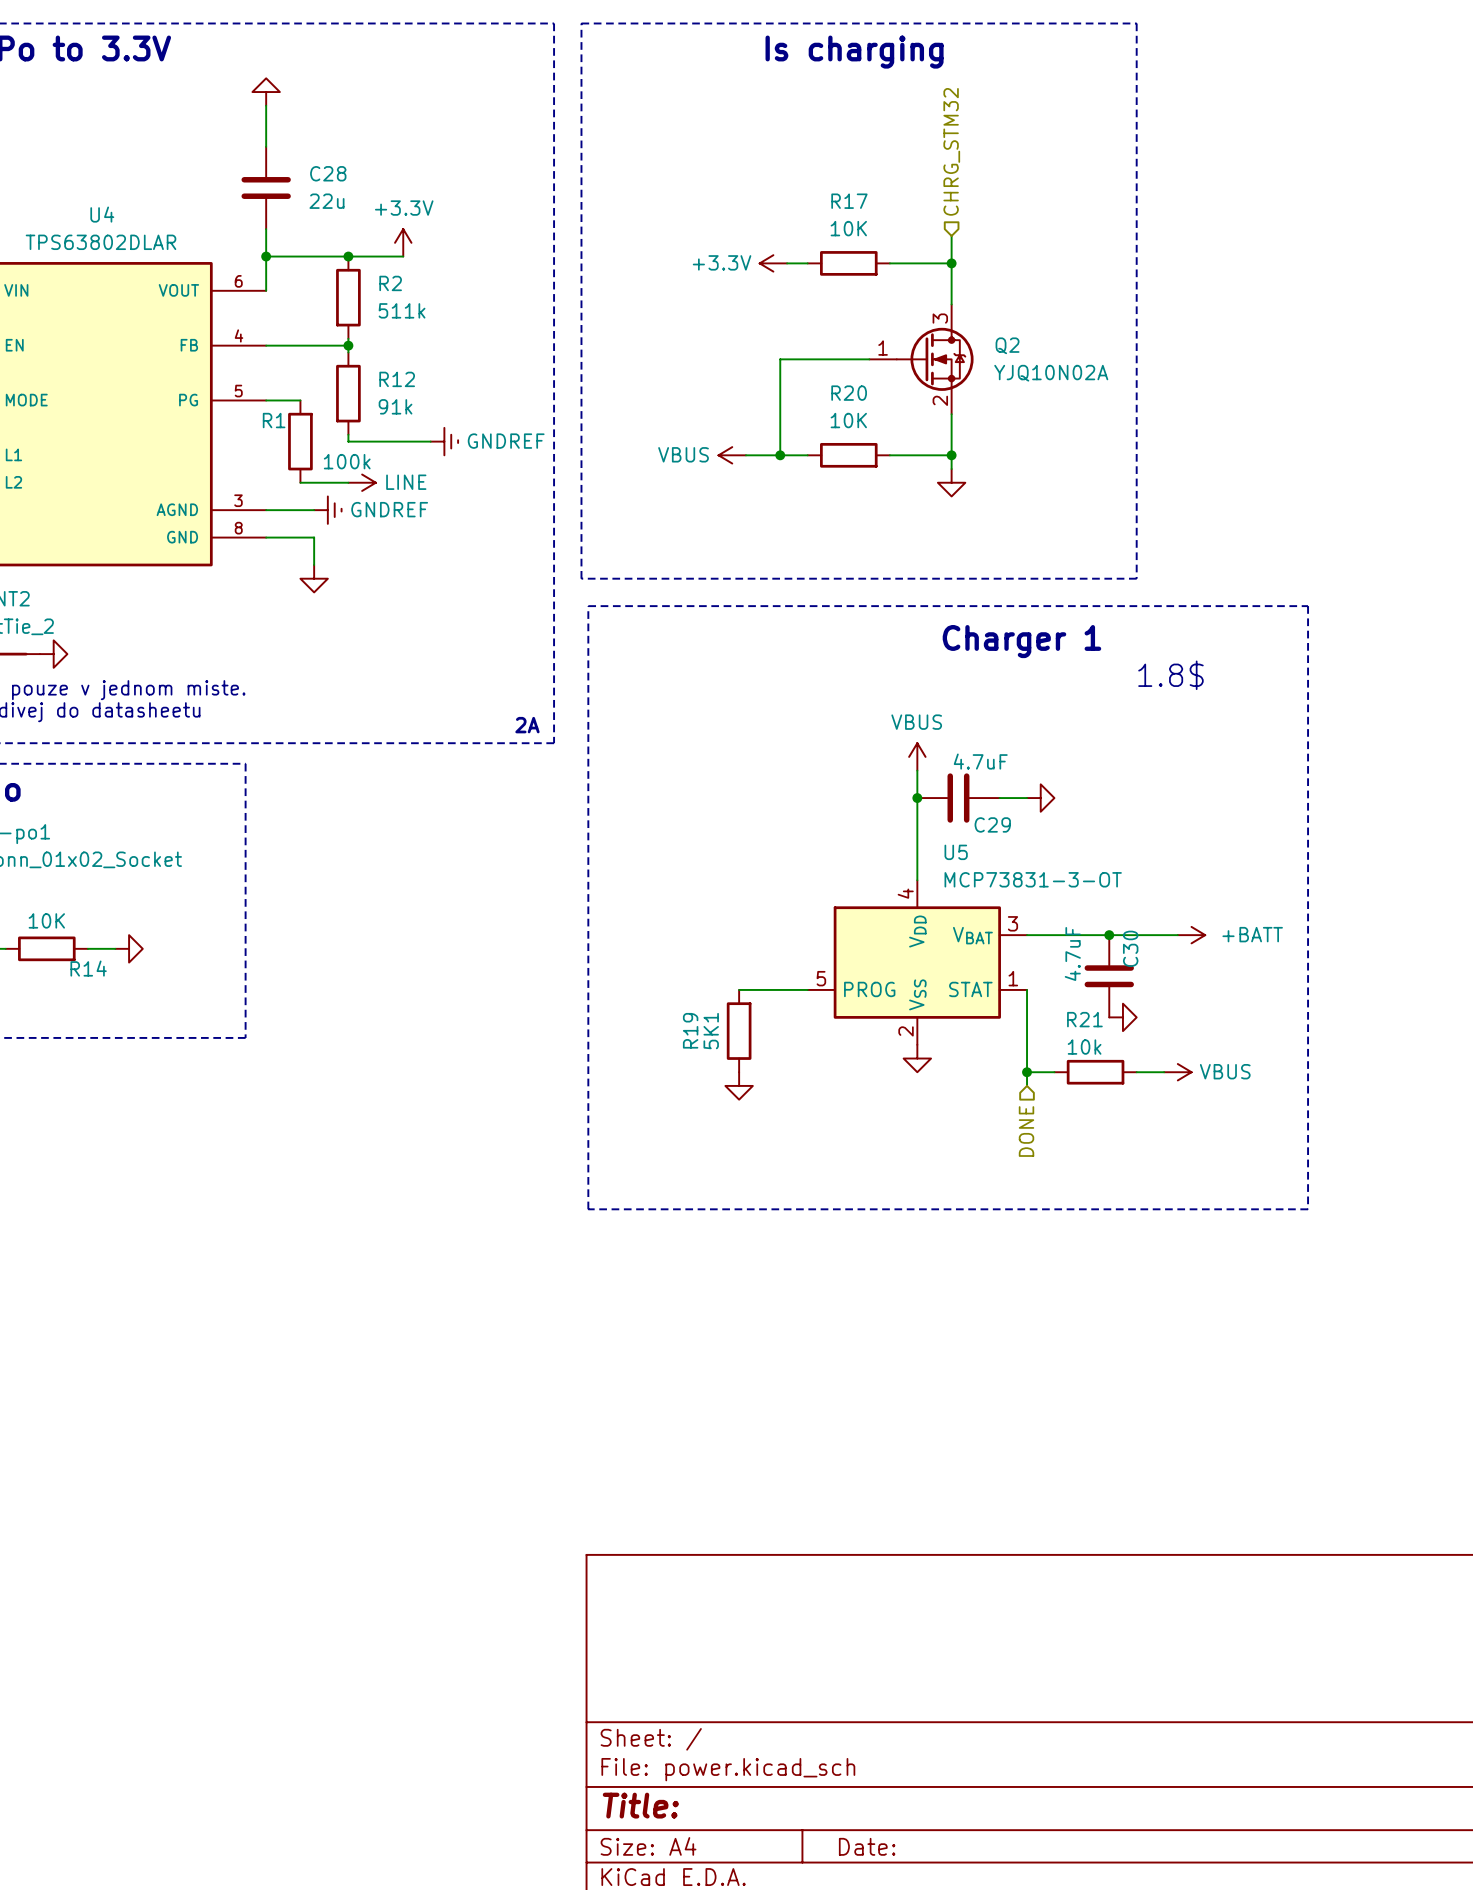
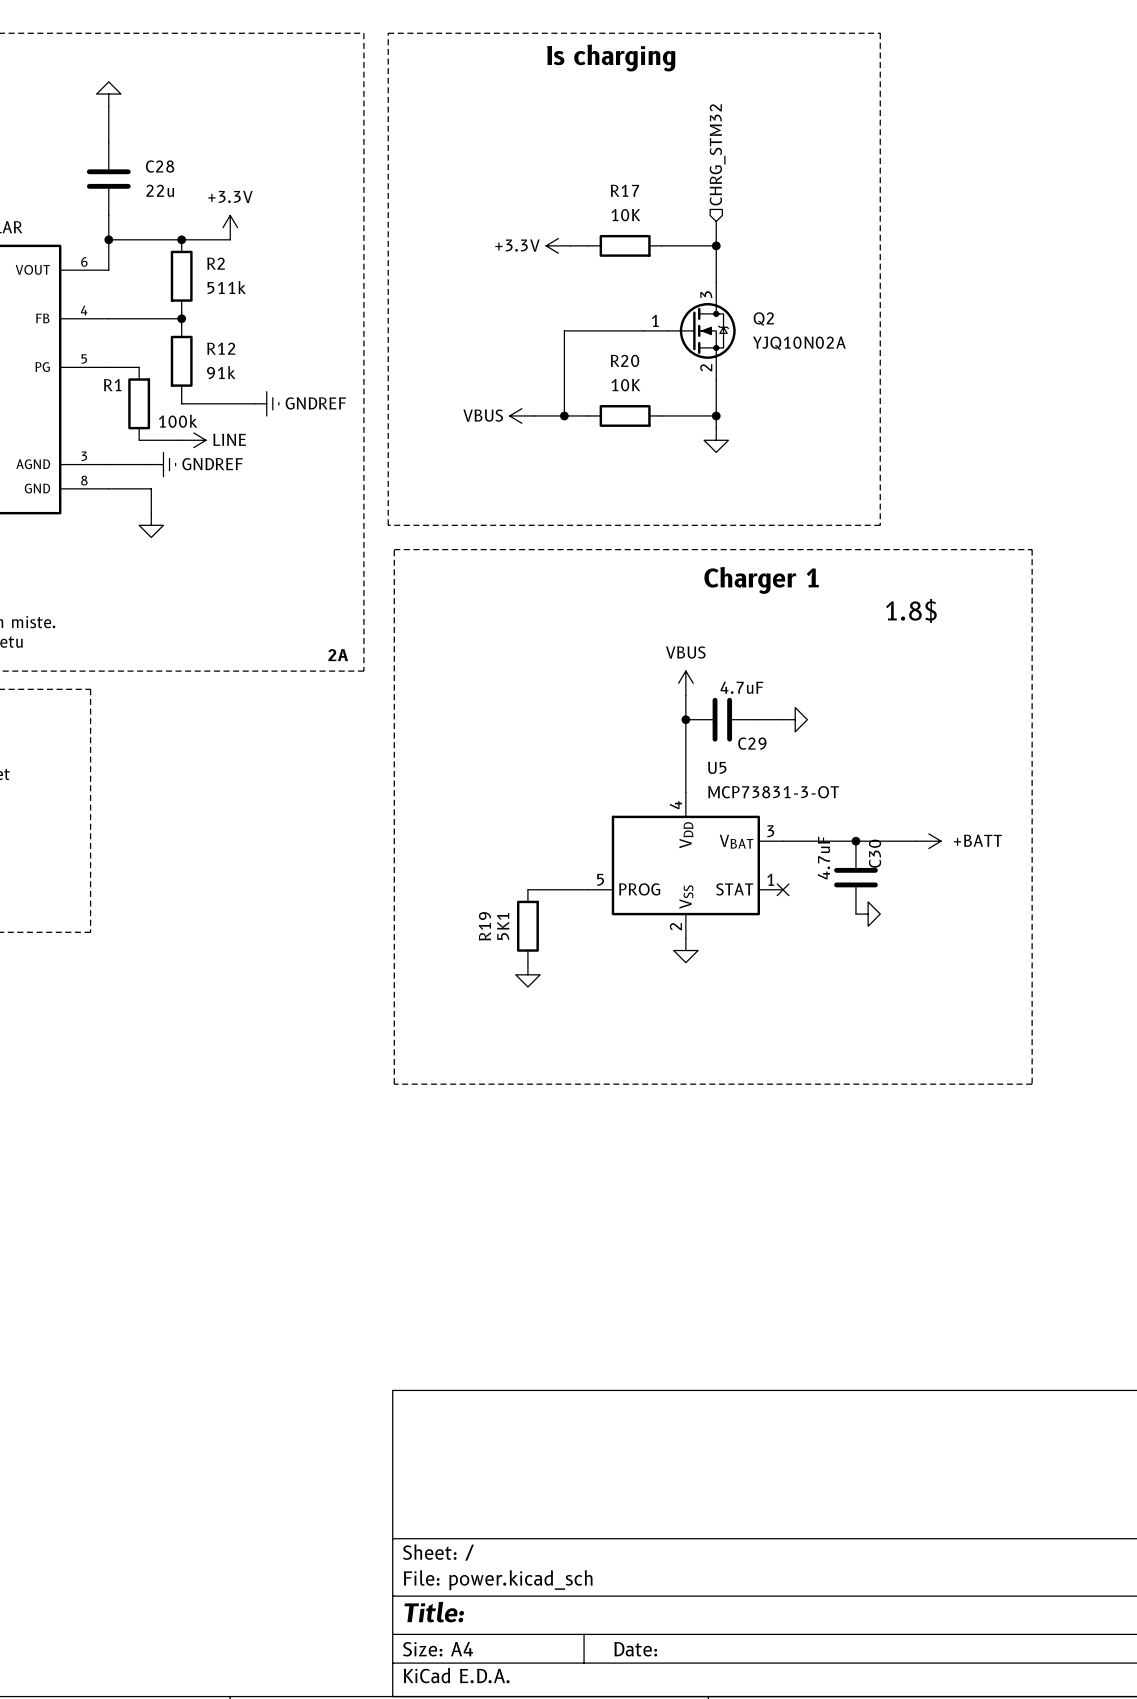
wire: (1027, 989) (1027, 1085) -> none
no-connect mark: none -> (783, 889)
wire: (1027, 1072) (1054, 1072) -> none
junction: (1027, 1072) -> none
R21: 10k (1095, 1072) -> none
wire: (1136, 1072) (1164, 1072) -> none
power symbol: VBUS (1177, 1072) -> none
hierarchical label: DONE (1026, 1131) -> none

